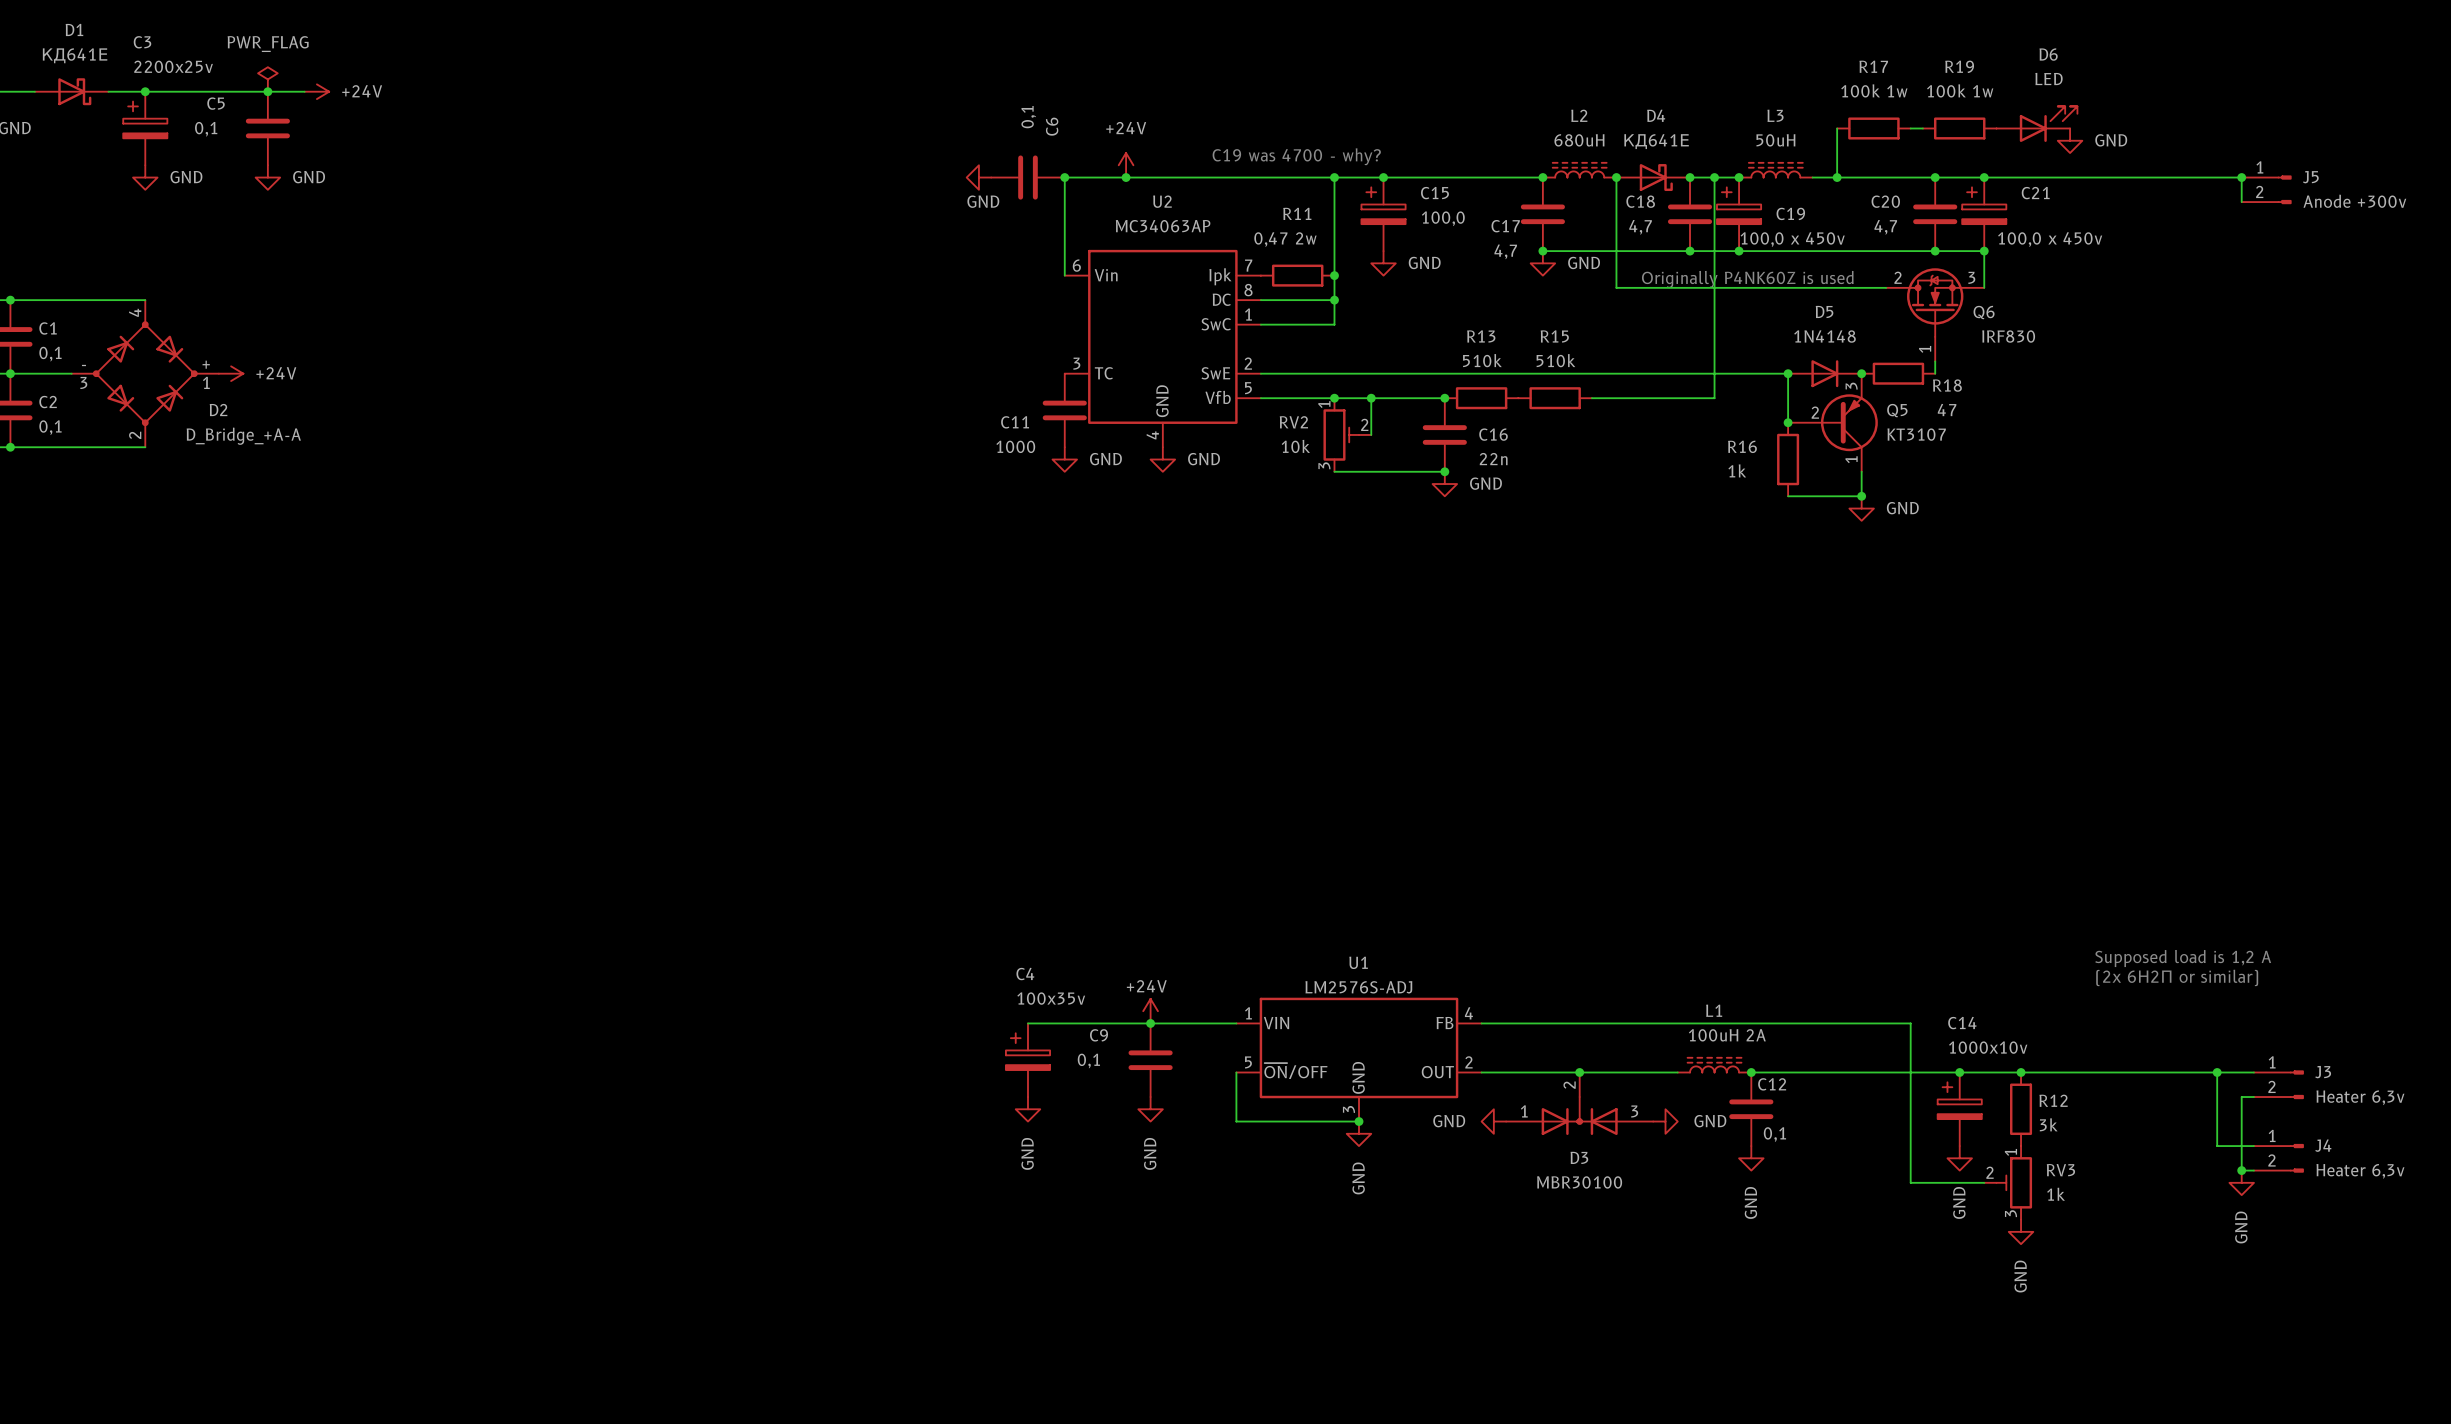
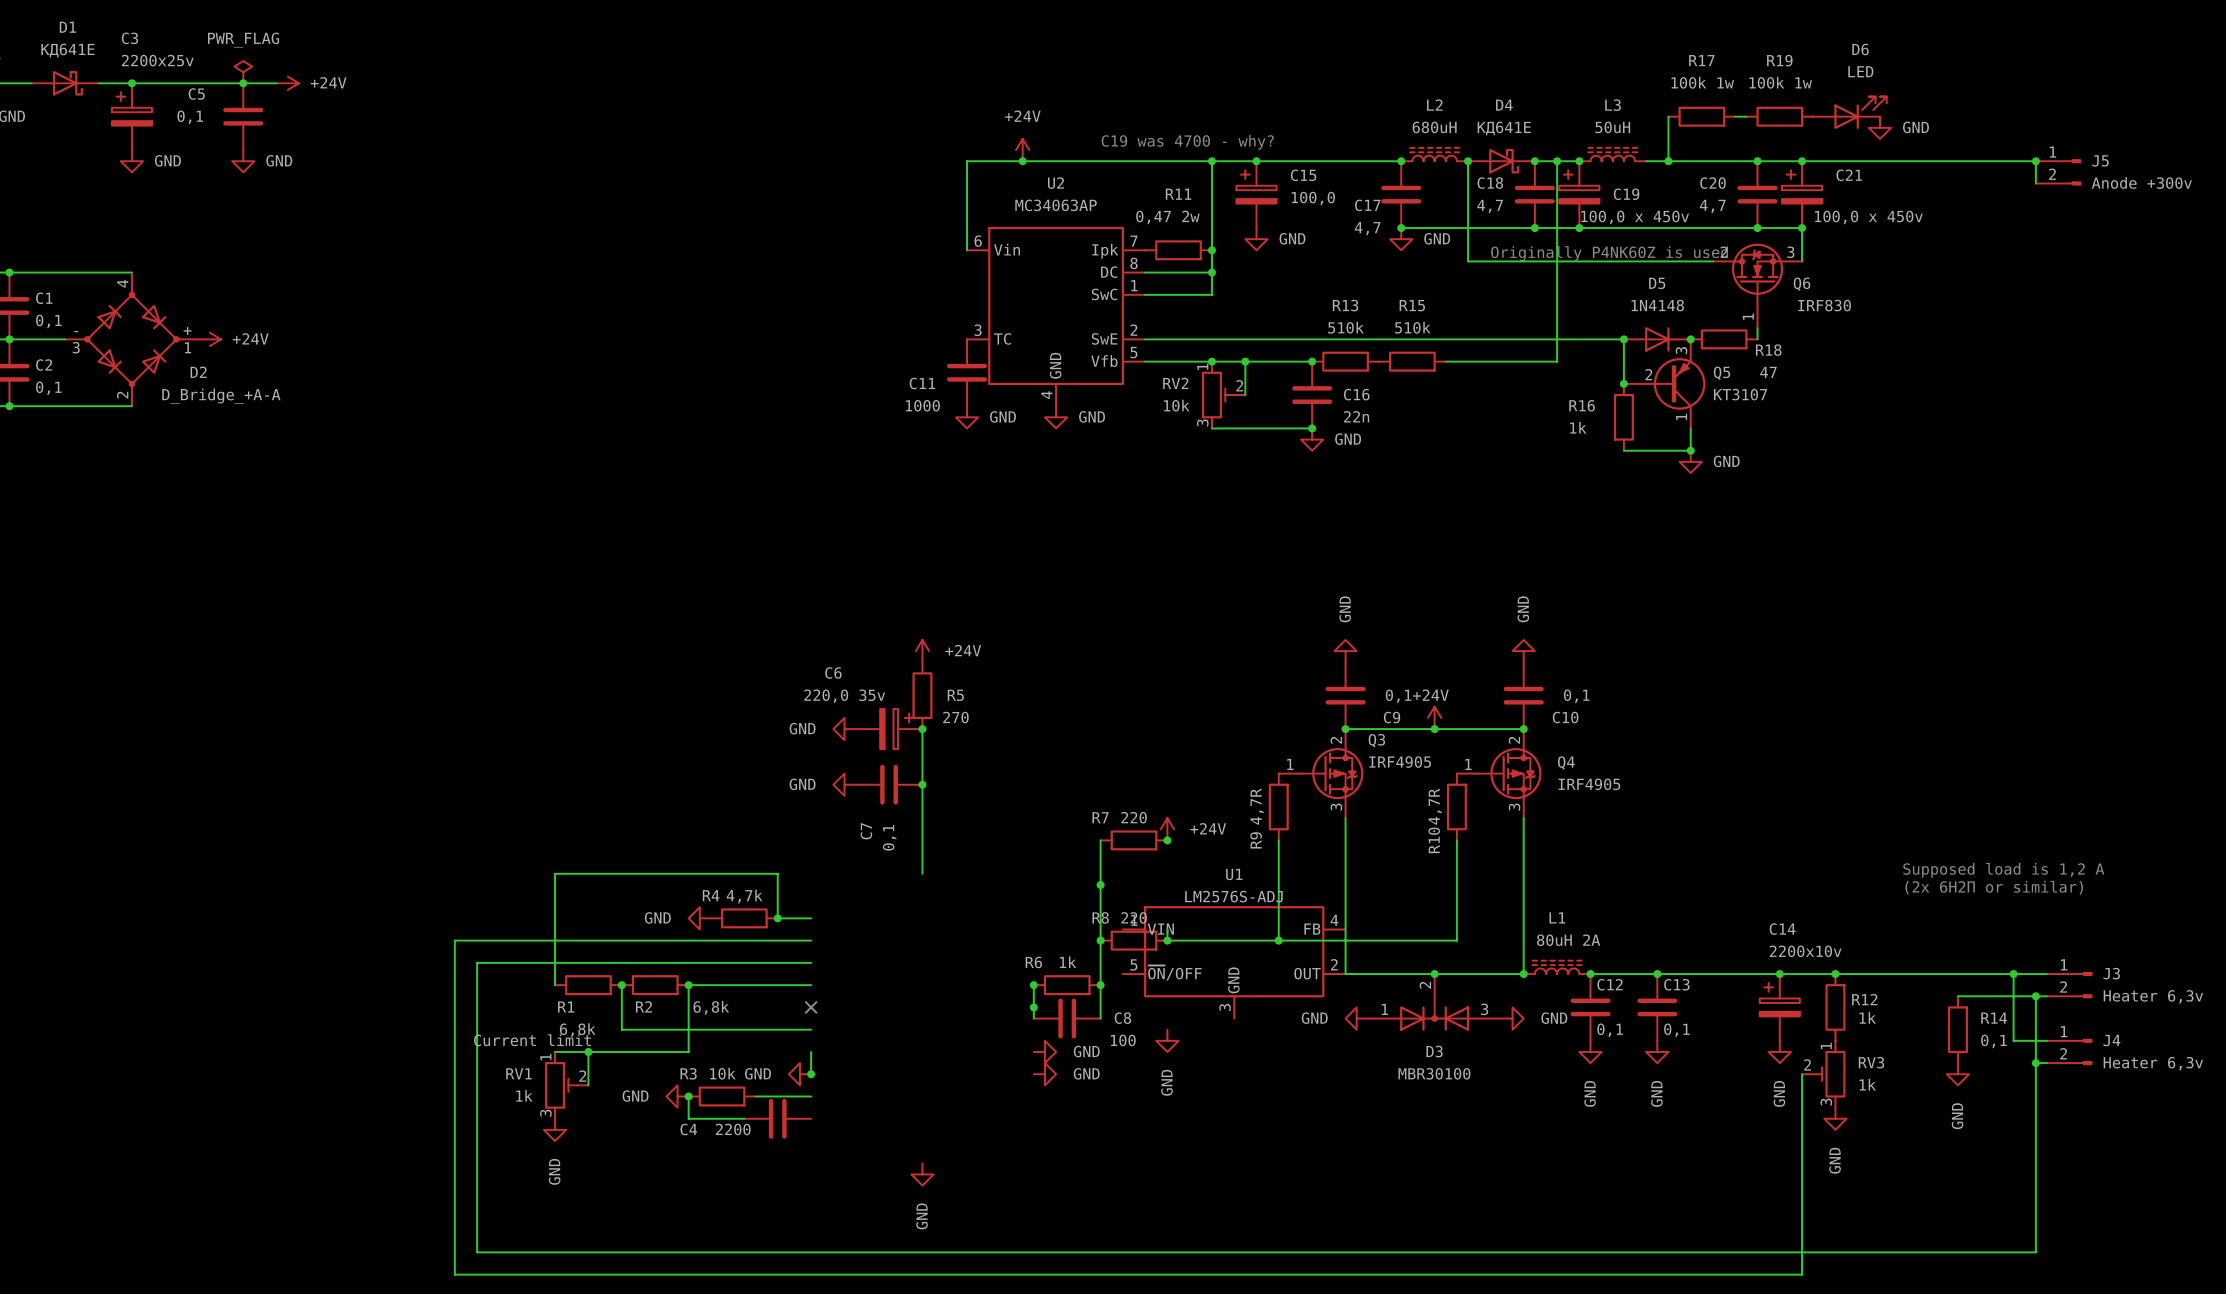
C6 value: 0,1 (1028, 117) -> 220,0 35v (844, 696)
C6 name position: C6 (1052, 126) -> C6 (833, 672)
C6 symbol: [991, 155, 1065, 200] -> [855, 709, 923, 750]
power symbol: GND (978, 177) -> none
junction: (1064, 177) -> none
power symbol: none -> +24V (922, 651)
power symbol: none -> GND (1345, 651)
power symbol: none -> GND (1523, 651)
R5: none -> 270 (922, 695)
C10: none -> 0,1 (1523, 695)
power symbol: none -> +24V (1434, 717)
power symbol: none -> GND (844, 729)
wire: none -> (922, 729) (922, 873)
junction: none -> (922, 729)
wire: none -> (1345, 729) (1523, 729)
junction: none -> (1345, 729)
junction: none -> (1434, 729)
junction: none -> (1523, 729)
Q3: none -> IRF4905 (1321, 773)
Q4: none -> IRF4905 (1499, 773)
power symbol: none -> GND (844, 784)
C7: none -> 0,1 (889, 784)
junction: none -> (922, 784)
R9: none -> 4,7R (1278, 807)
R10: none -> 4,7R (1456, 807)
wire: none -> (1345, 818) (1345, 974)
wire: none -> (1523, 818) (1523, 974)
power symbol: none -> +24V (1167, 829)
wire: none -> (1100, 840) (1100, 1018)
R7: none -> 220 (1134, 840)
junction: none -> (1167, 840)
wire: none -> (1278, 840) (1278, 940)
wire: none -> (1456, 840) (1456, 940) (1167, 940) (1167, 929)
C4 name position: C4 (1025, 974) -> C4 (688, 1129)
junction: none -> (1100, 884)
C4 value: 100x35v (1051, 998) -> 2200 (733, 1129)
power symbol: none -> GND (699, 918)
R4: none -> 4,7k (744, 918)
junction: none -> (777, 918)
wire: none -> (811, 918) (777, 918) (777, 873) (555, 873) (555, 985)
power symbol: +24V (1150, 1011) -> none
C4 symbol: [1005, 1023, 1051, 1098] -> [744, 1098, 812, 1139]
wire: (1027, 1023) (1236, 1023) -> none
junction: (1150, 1023) -> none
wire: (1481, 1023) (1910, 1023) (1910, 1182) (1984, 1182) -> (811, 940) (454, 940) (454, 1274) (1802, 1274) (1802, 1074)
C9 name position: C9 (1099, 1035) -> C9 (1392, 717)
junction: none -> (1100, 940)
R8: none -> 220 (1134, 940)
junction: none -> (1167, 940)
junction: none -> (1278, 940)
L1 value: 100uH 2A (1727, 1035) -> 80uH 2A (1568, 940)
C14 value: 1000x10v (1988, 1047) -> 2200x10v (1805, 951)
wire: none -> (811, 962) (477, 962) (477, 1252) (2035, 1252) (2035, 1063)
C9 value position: 0,1 (1088, 1060) -> 0,1 (1398, 696)
C9 position: (1150, 1060) -> (1345, 695)
wire: (1236, 1072) (1236, 1121) (1359, 1121) -> none
junction: none -> (1523, 974)
junction: none -> (1657, 974)
R1: none -> 6,8k (588, 985)
wire: none -> (621, 985) (621, 1029) (811, 1029)
junction: none -> (621, 985)
R2: none -> 6,8k (655, 985)
junction: none -> (688, 985)
wire: none -> (811, 985) (688, 985) (688, 1051) (555, 1051)
wire: none -> (1033, 985) (1033, 1018)
junction: none -> (1033, 985)
R6: none -> 1k (1067, 985)
junction: none -> (1100, 985)
wire: none -> (1957, 996) (2035, 996)
junction: none -> (2035, 996)
no-connect mark: none -> (811, 1007)
power symbol: GND (1027, 1109) -> none
junction: none -> (1033, 1007)
power symbol: GND (1150, 1109) -> none
C13: none -> 0,1 (1657, 1007)
C8: none -> 100 (1067, 1018)
junction: (1359, 1121) -> none
R12 value: 3k (2048, 1124) -> 1k (1867, 1017)
power symbol: GND (1359, 1133) -> none
R14: none -> 0,1 (1957, 1029)
power symbol: none -> GND (1167, 1040)
wire: none -> (588, 1051) (588, 1085)
junction: none -> (588, 1051)
wire: none -> (811, 1051) (811, 1074)
power symbol: none -> GND (1044, 1051)
power symbol: none -> GND (1657, 1051)
power symbol: none -> GND (799, 1074)
junction: none -> (811, 1074)
power symbol: none -> GND (1044, 1074)
power symbol position: GND (2241, 1182) -> GND (1957, 1074)
RV1: none -> 1k (566, 1085)
power symbol: none -> GND (677, 1096)
wire: none -> (688, 1096) (688, 1118) (744, 1118)
junction: none -> (688, 1096)
R3: none -> 10k (722, 1096)
wire: none -> (755, 1096) (811, 1096)
power symbol: none -> GND (555, 1129)
power symbol: none -> GND (922, 1174)

